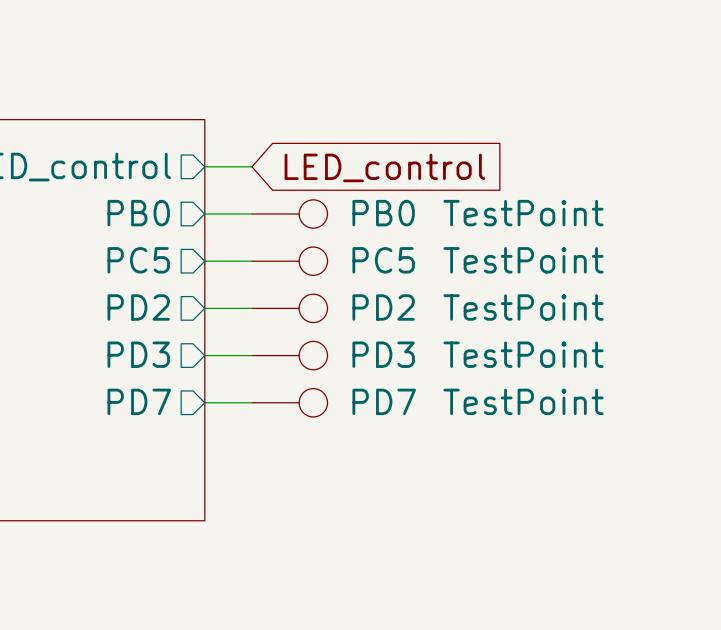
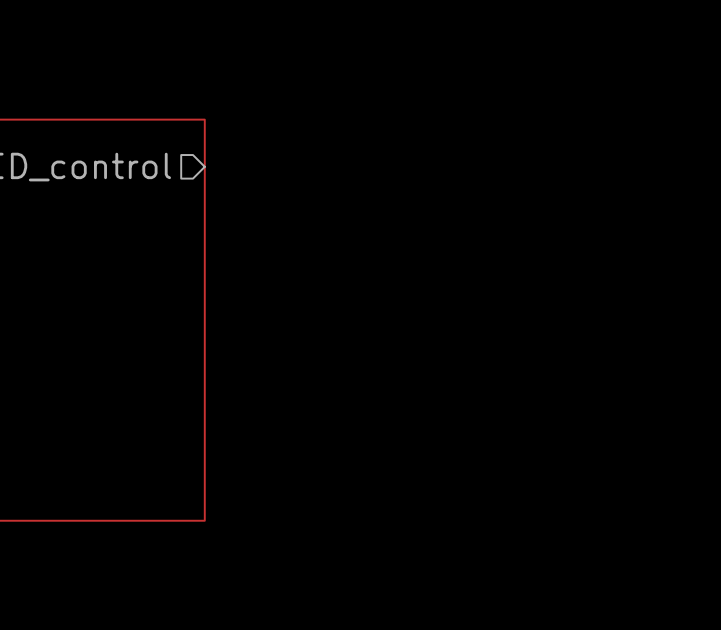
wire: (204, 166) (251, 166) -> none
global label: LED_control (384, 167) -> none
sheet pin: PB0 (138, 213) -> none
wire: (204, 214) (251, 214) -> none
PB0: TestPoint (289, 214) -> none
sheet pin: PC5 (138, 260) -> none
wire: (204, 261) (251, 261) -> none
PC5: TestPoint (289, 261) -> none
sheet pin: PD2 (138, 307) -> none
wire: (204, 308) (251, 308) -> none
PD2: TestPoint (289, 308) -> none
sheet pin: PD3 (138, 354) -> none
wire: (204, 355) (251, 355) -> none
PD3: TestPoint (289, 355) -> none
sheet pin: PD7 (139, 401) -> none
wire: (204, 402) (251, 402) -> none
PD7: TestPoint (289, 402) -> none

